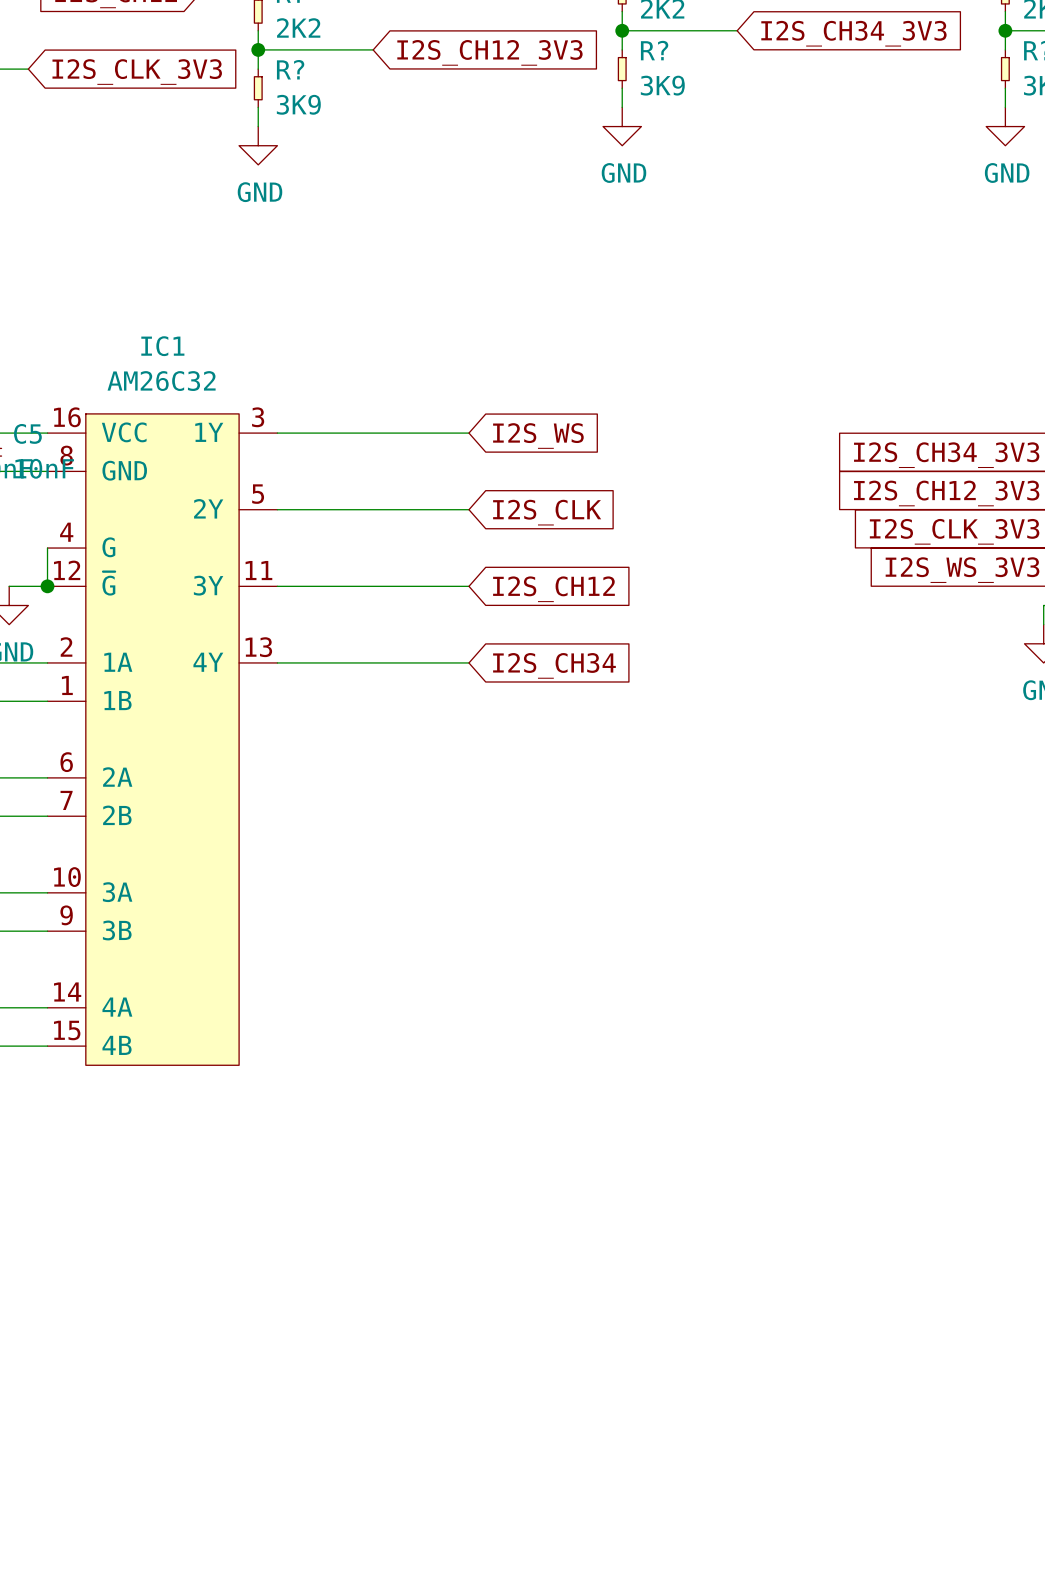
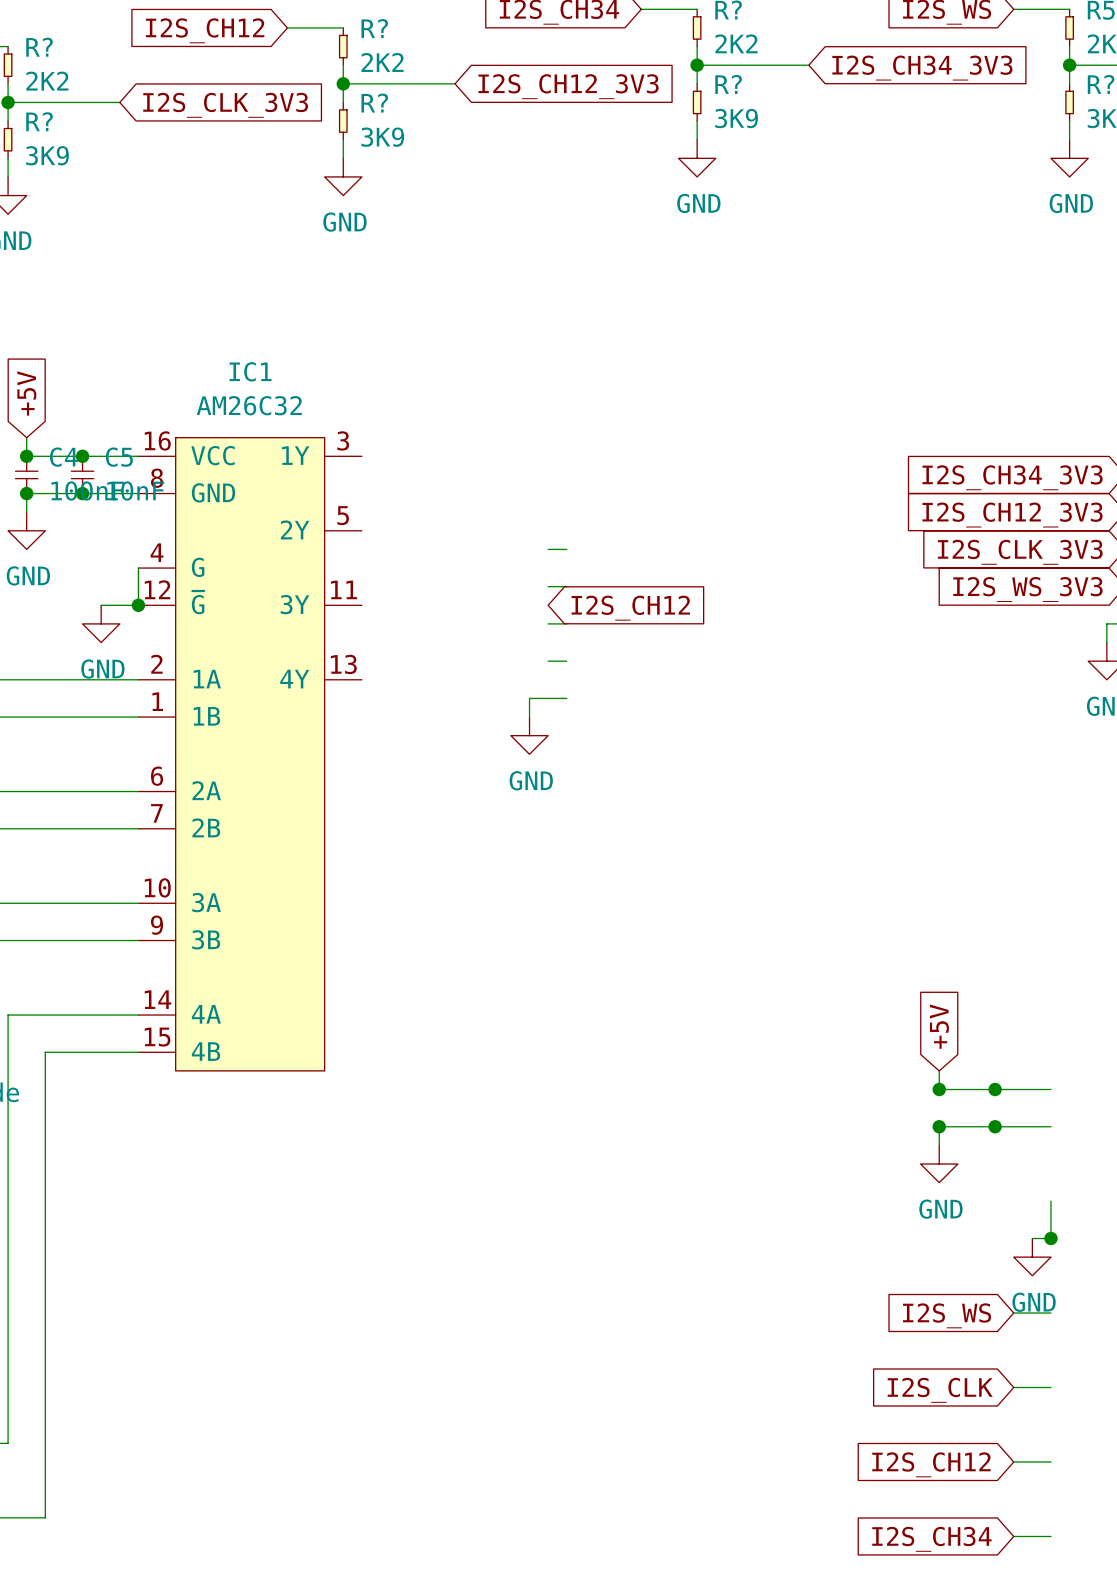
wire: (277, 433) (468, 433) -> none
global label: I2S_WS (538, 436) -> none
wire: (277, 509) (468, 509) -> none
global label: I2S_CLK (547, 512) -> none
wire: none -> (548, 549) (566, 549)
wire: none -> (548, 586) (566, 586)
wire: (277, 586) (468, 586) -> none
wire: none -> (548, 623) (566, 623)
wire: none -> (548, 661) (566, 661)
wire: (277, 662) (468, 662) -> none
global label: I2S_CH34 (554, 665) -> none
wire: none -> (566, 698) (529, 698) (529, 717)
power symbol: none -> GND (529, 735)
global label: none -> +5V (939, 1026)
wire: none -> (939, 1070) (939, 1089) (1050, 1089)
junction: none -> (939, 1089)
junction: none -> (995, 1089)
junction: none -> (939, 1126)
junction: none -> (995, 1126)
wire: none -> (1050, 1126) (939, 1126) (939, 1145)
power symbol: none -> GND (939, 1164)
wire: none -> (1050, 1201) (1050, 1238) (1032, 1238)
junction: none -> (1050, 1238)
power symbol: none -> GND (1032, 1257)
wire: none -> (1013, 1313) (1050, 1313)
global label: none -> I2S_WS (947, 1315)
wire: none -> (1013, 1387) (1050, 1387)
global label: none -> I2S_CLK (940, 1390)
wire: none -> (1013, 1461) (1050, 1461)
global label: none -> I2S_CH12 (931, 1464)
wire: none -> (1013, 1536) (1050, 1536)
global label: none -> I2S_CH34 (931, 1539)

